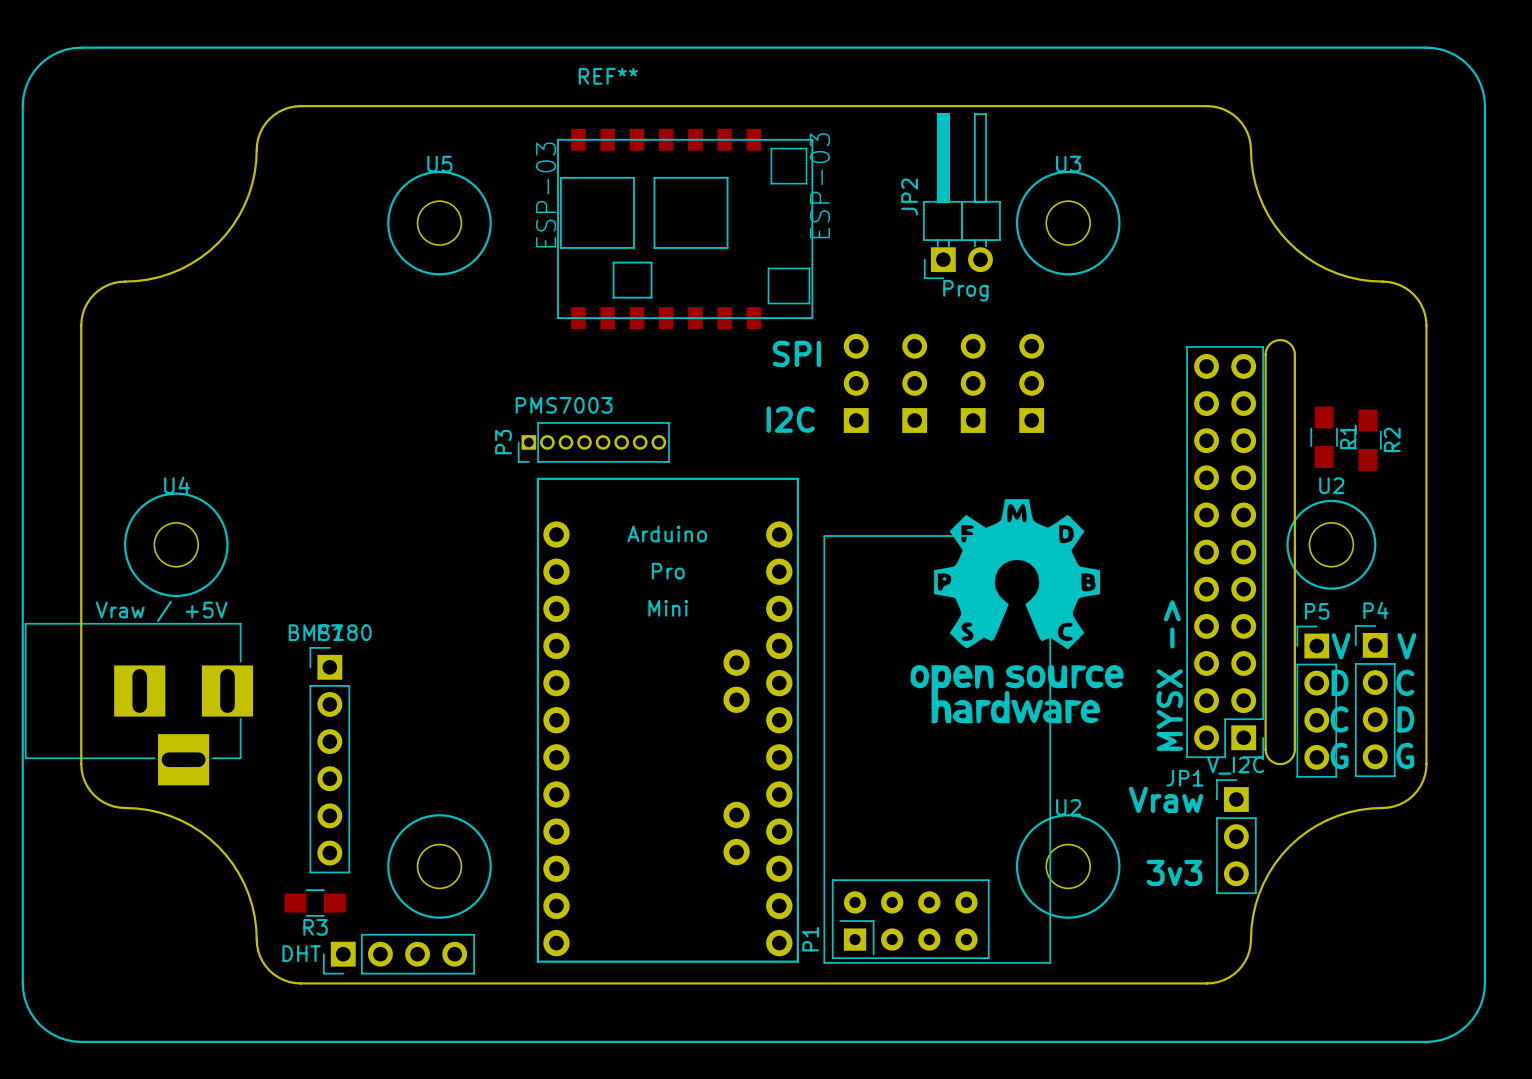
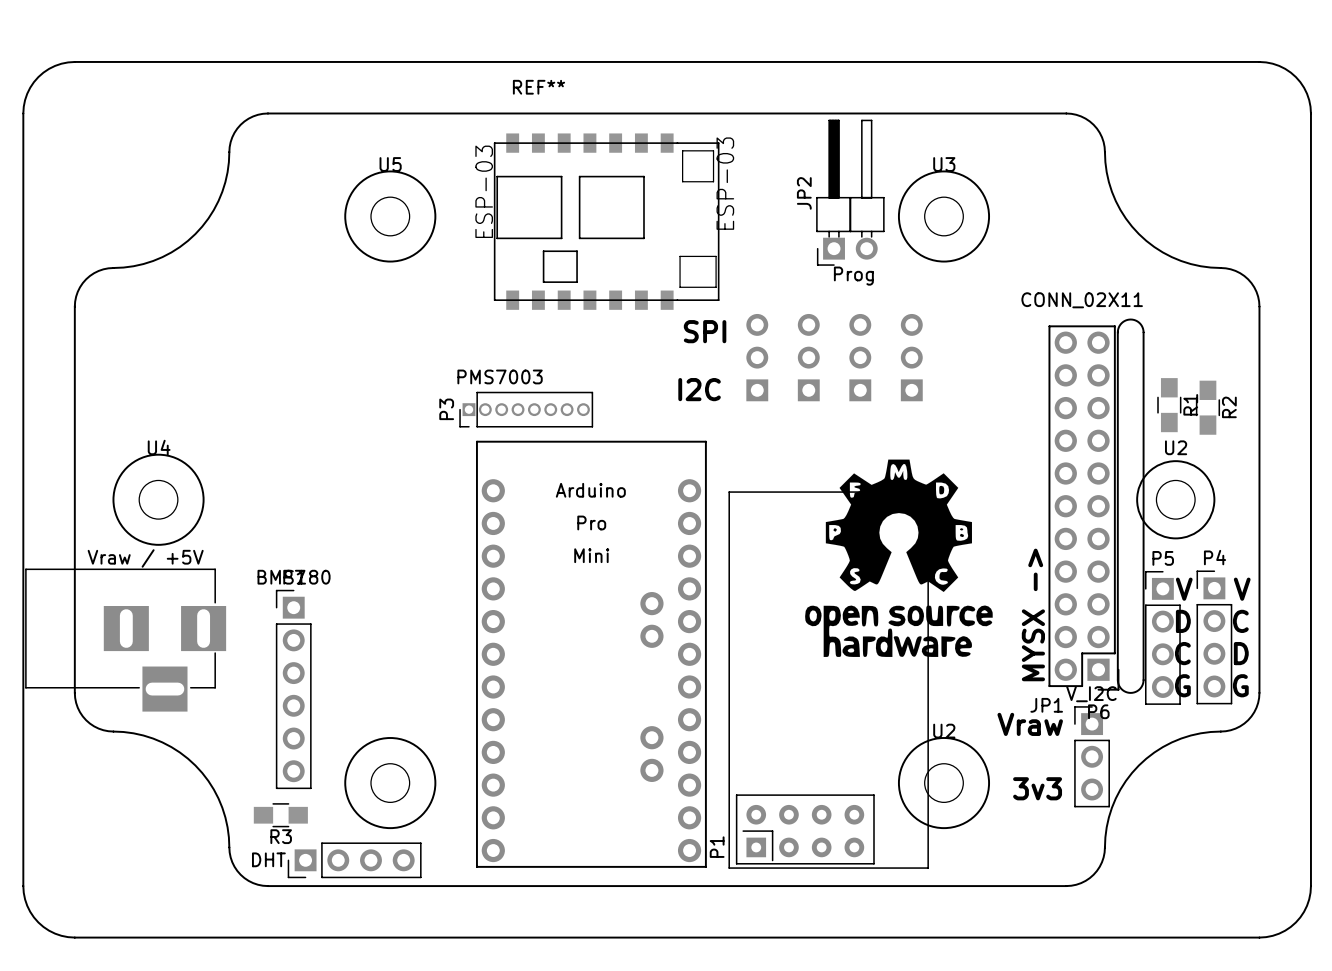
part: (1225, 552) -> none
P6: none -> CONN_02X11 (1083, 508)

